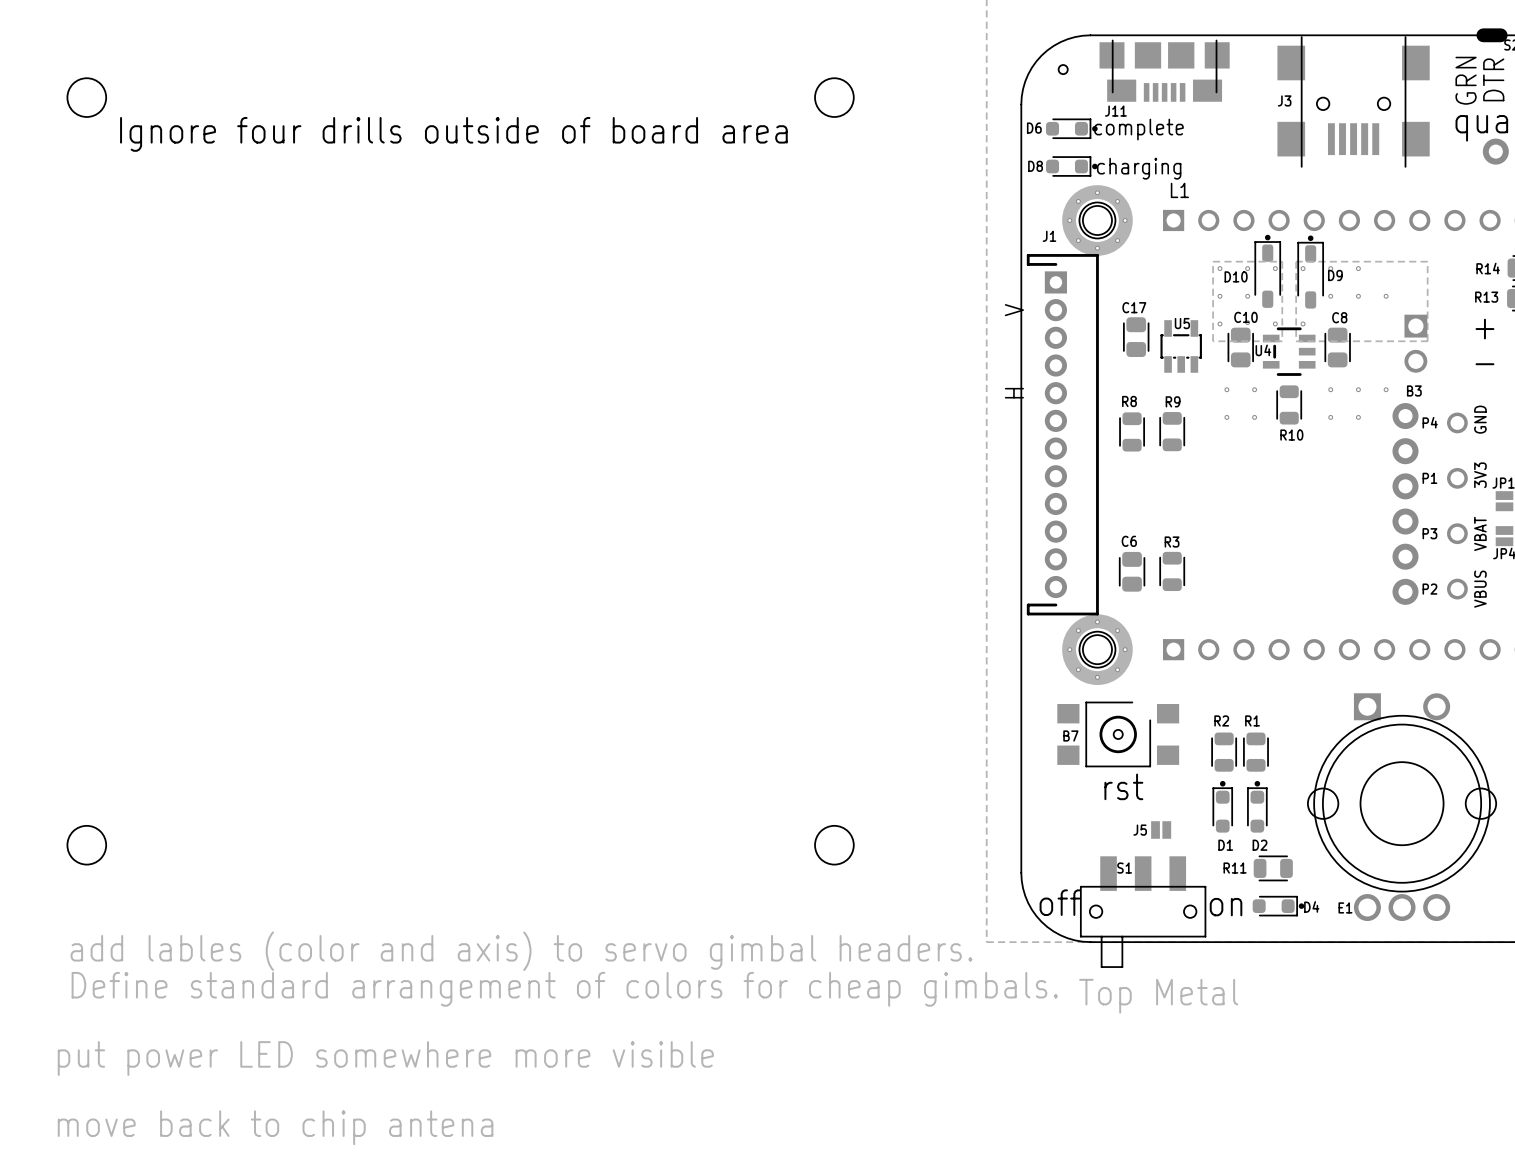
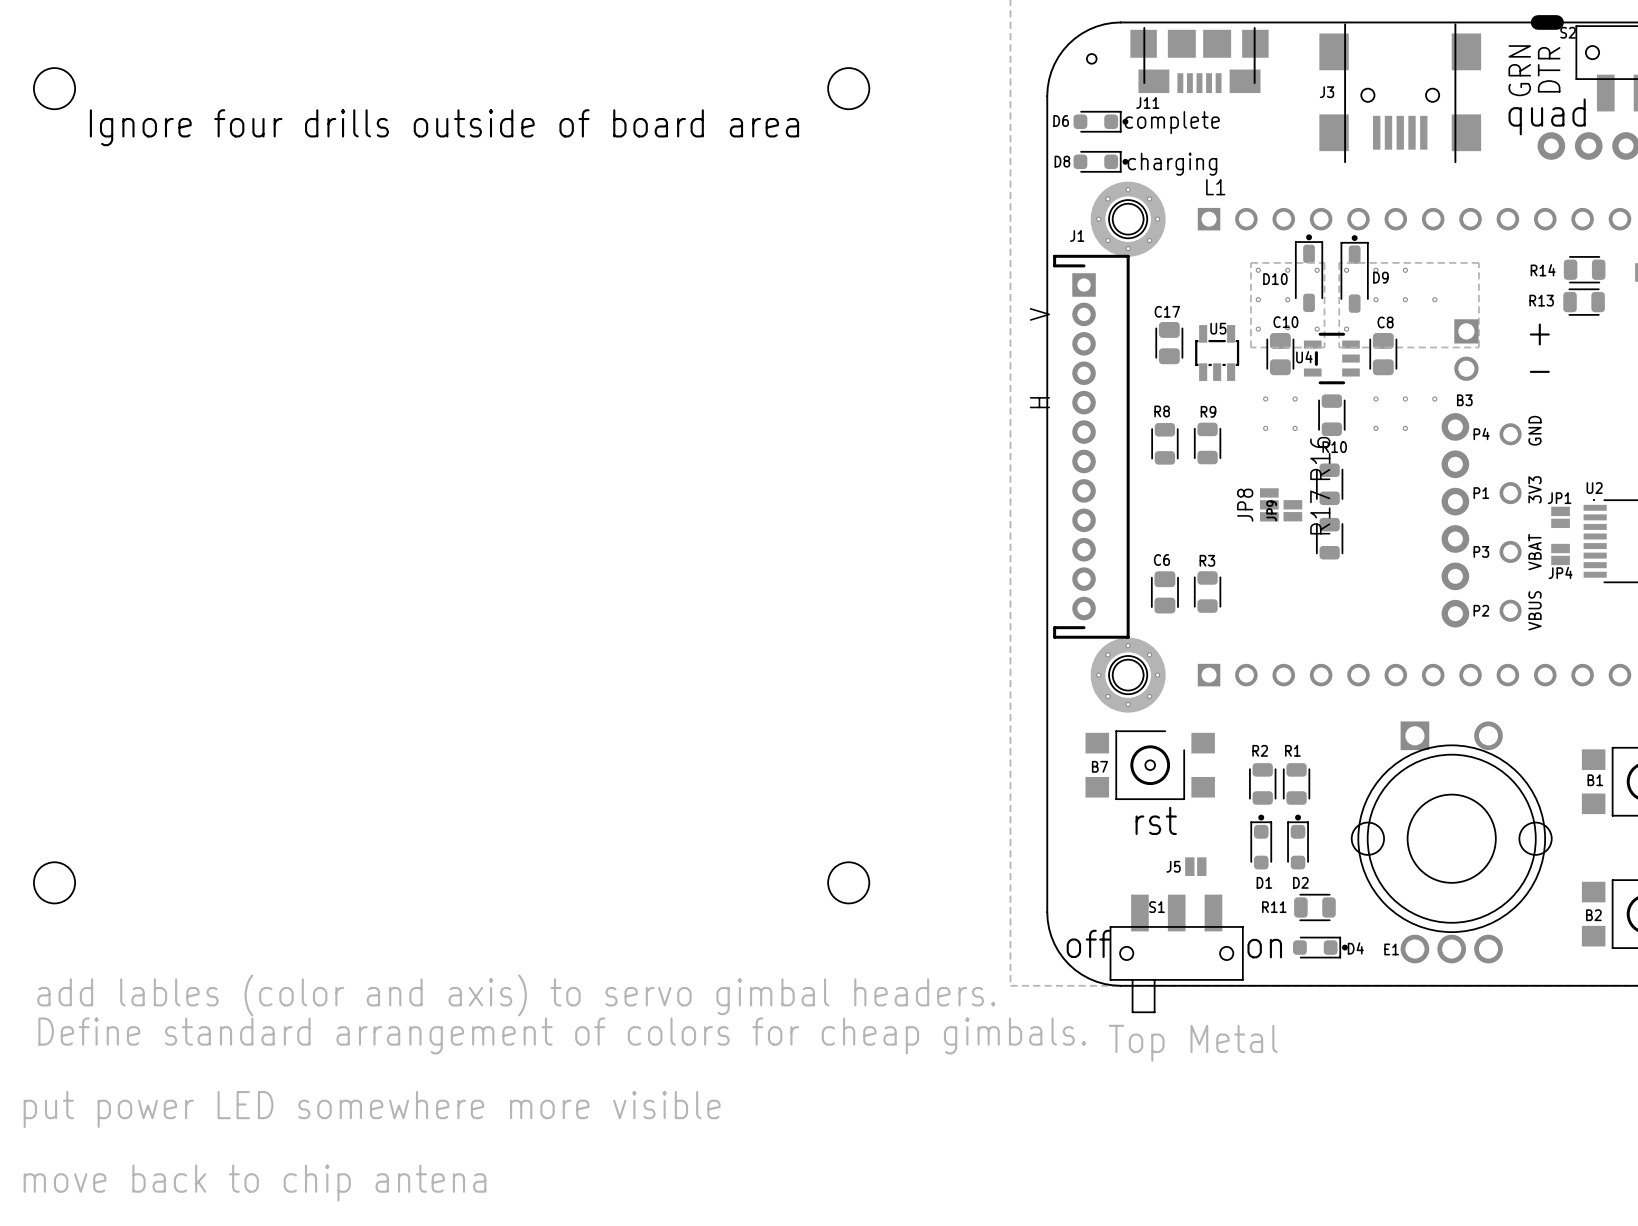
R16: none -> (1329, 484)
JP8: none -> (1269, 504)
JP9: none -> (1292, 510)
R17: none -> (1329, 538)

